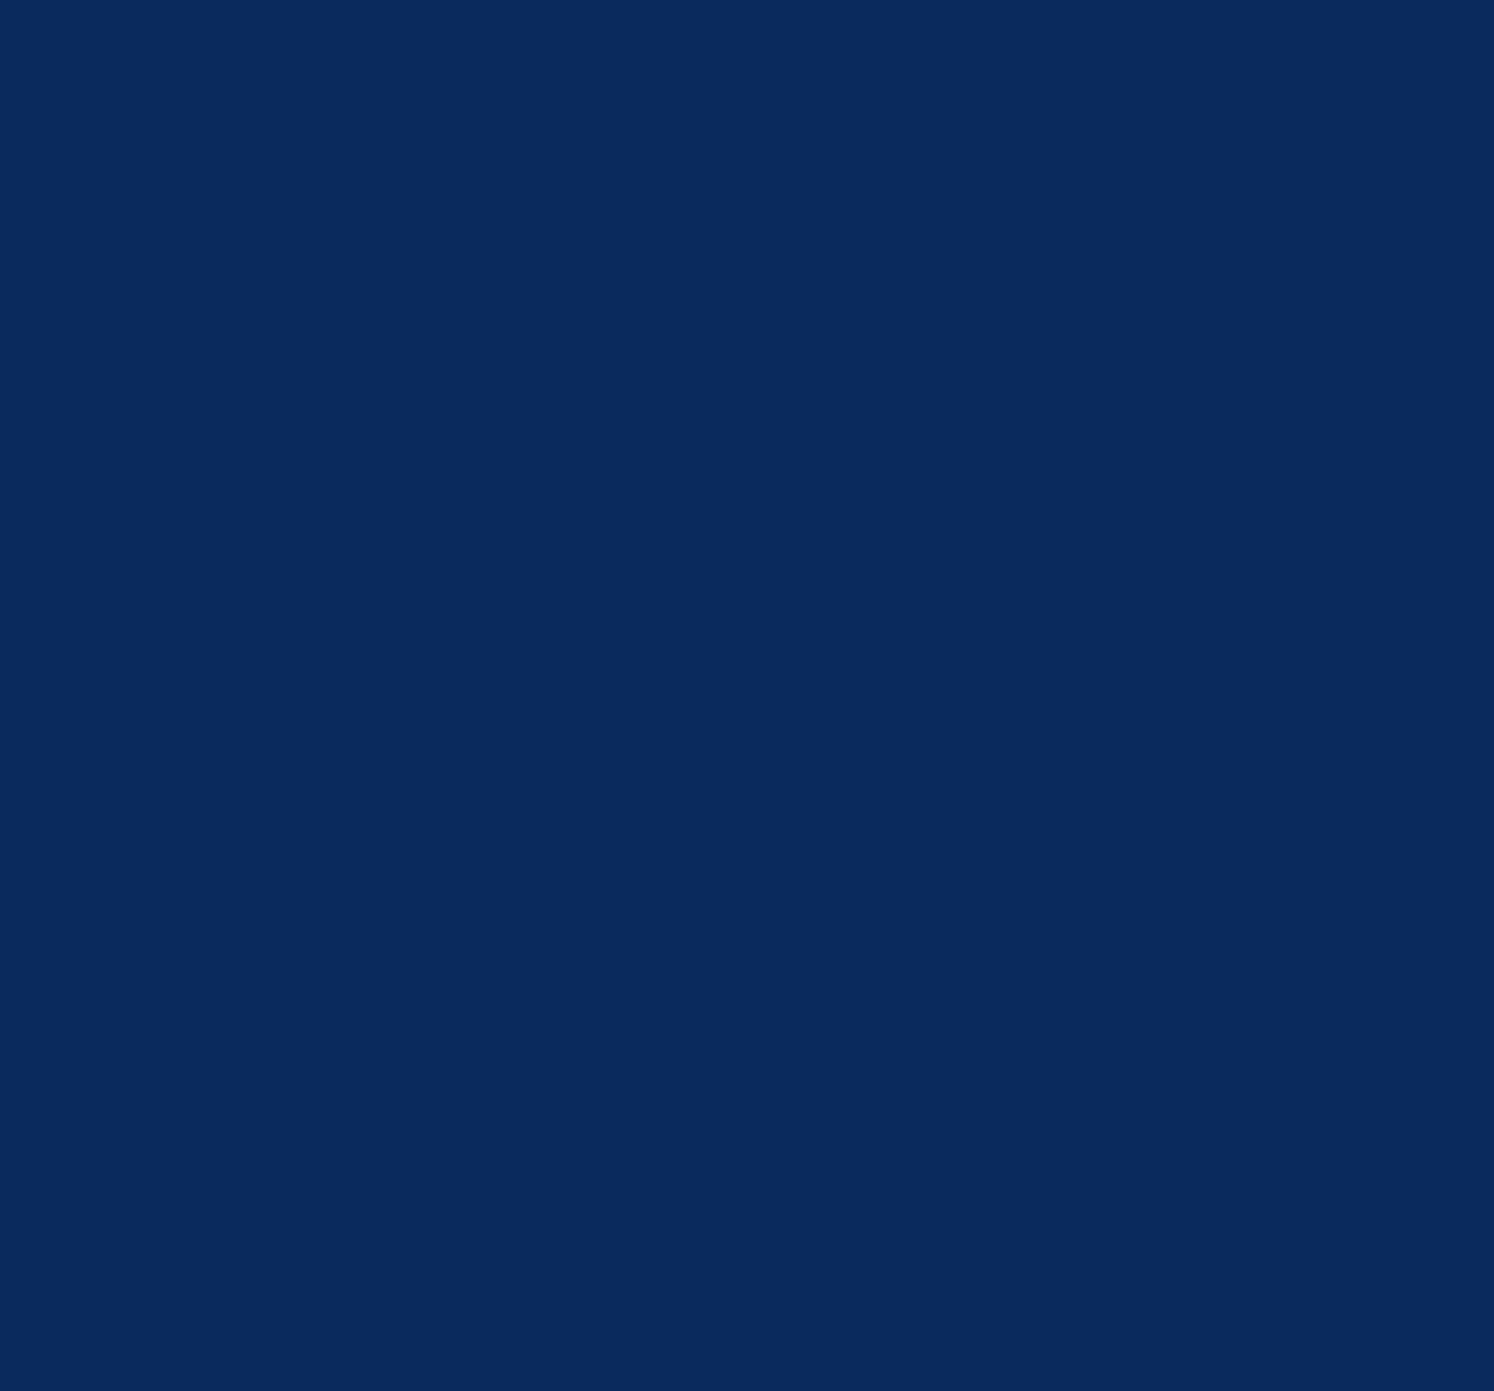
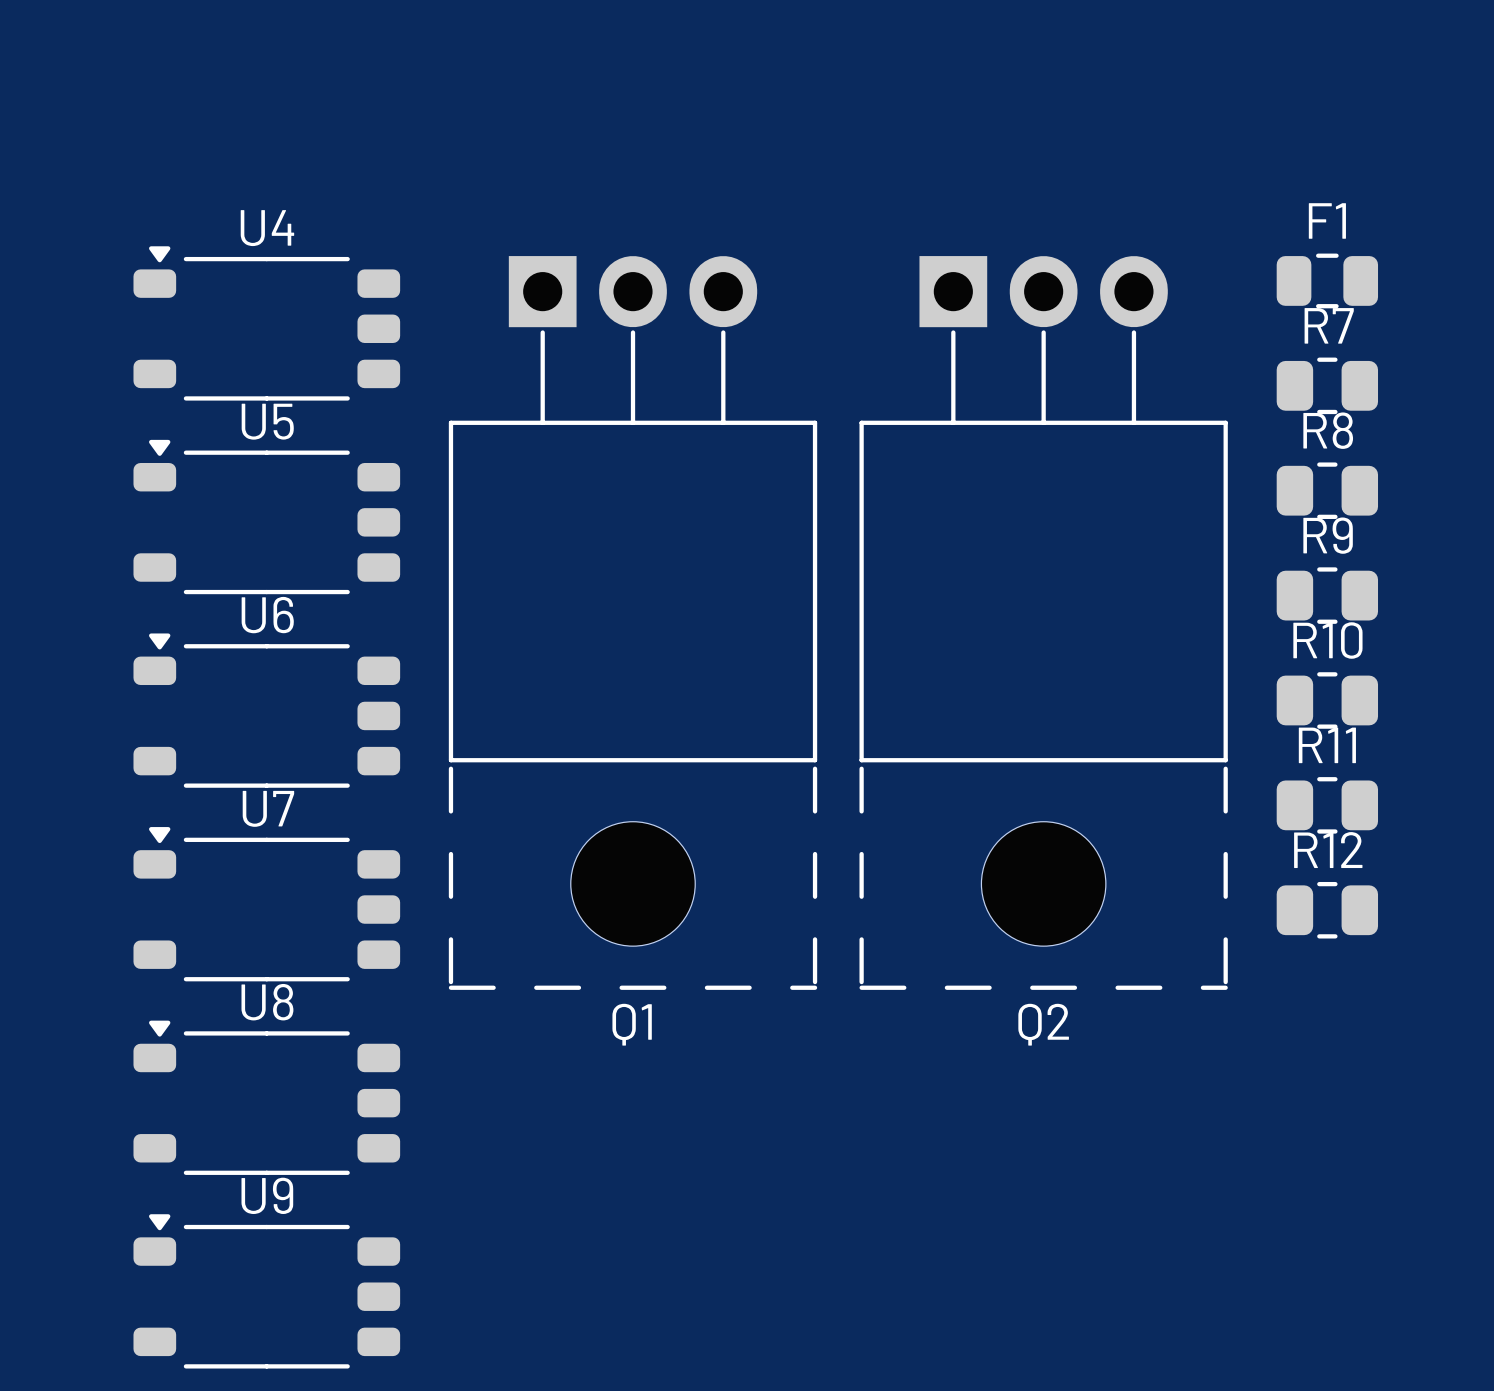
F1: none -> (1327, 280)
U4: none -> (266, 323)
R7: none -> (1327, 385)
R8: none -> (1327, 490)
U5: none -> (266, 517)
R9: none -> (1327, 595)
Q1: none -> (633, 622)
Q2: none -> (1043, 622)
R10: none -> (1327, 700)
U6: none -> (266, 710)
R11: none -> (1327, 805)
U7: none -> (266, 904)
R12: none -> (1327, 910)
U8: none -> (266, 1097)
U9: none -> (266, 1291)

